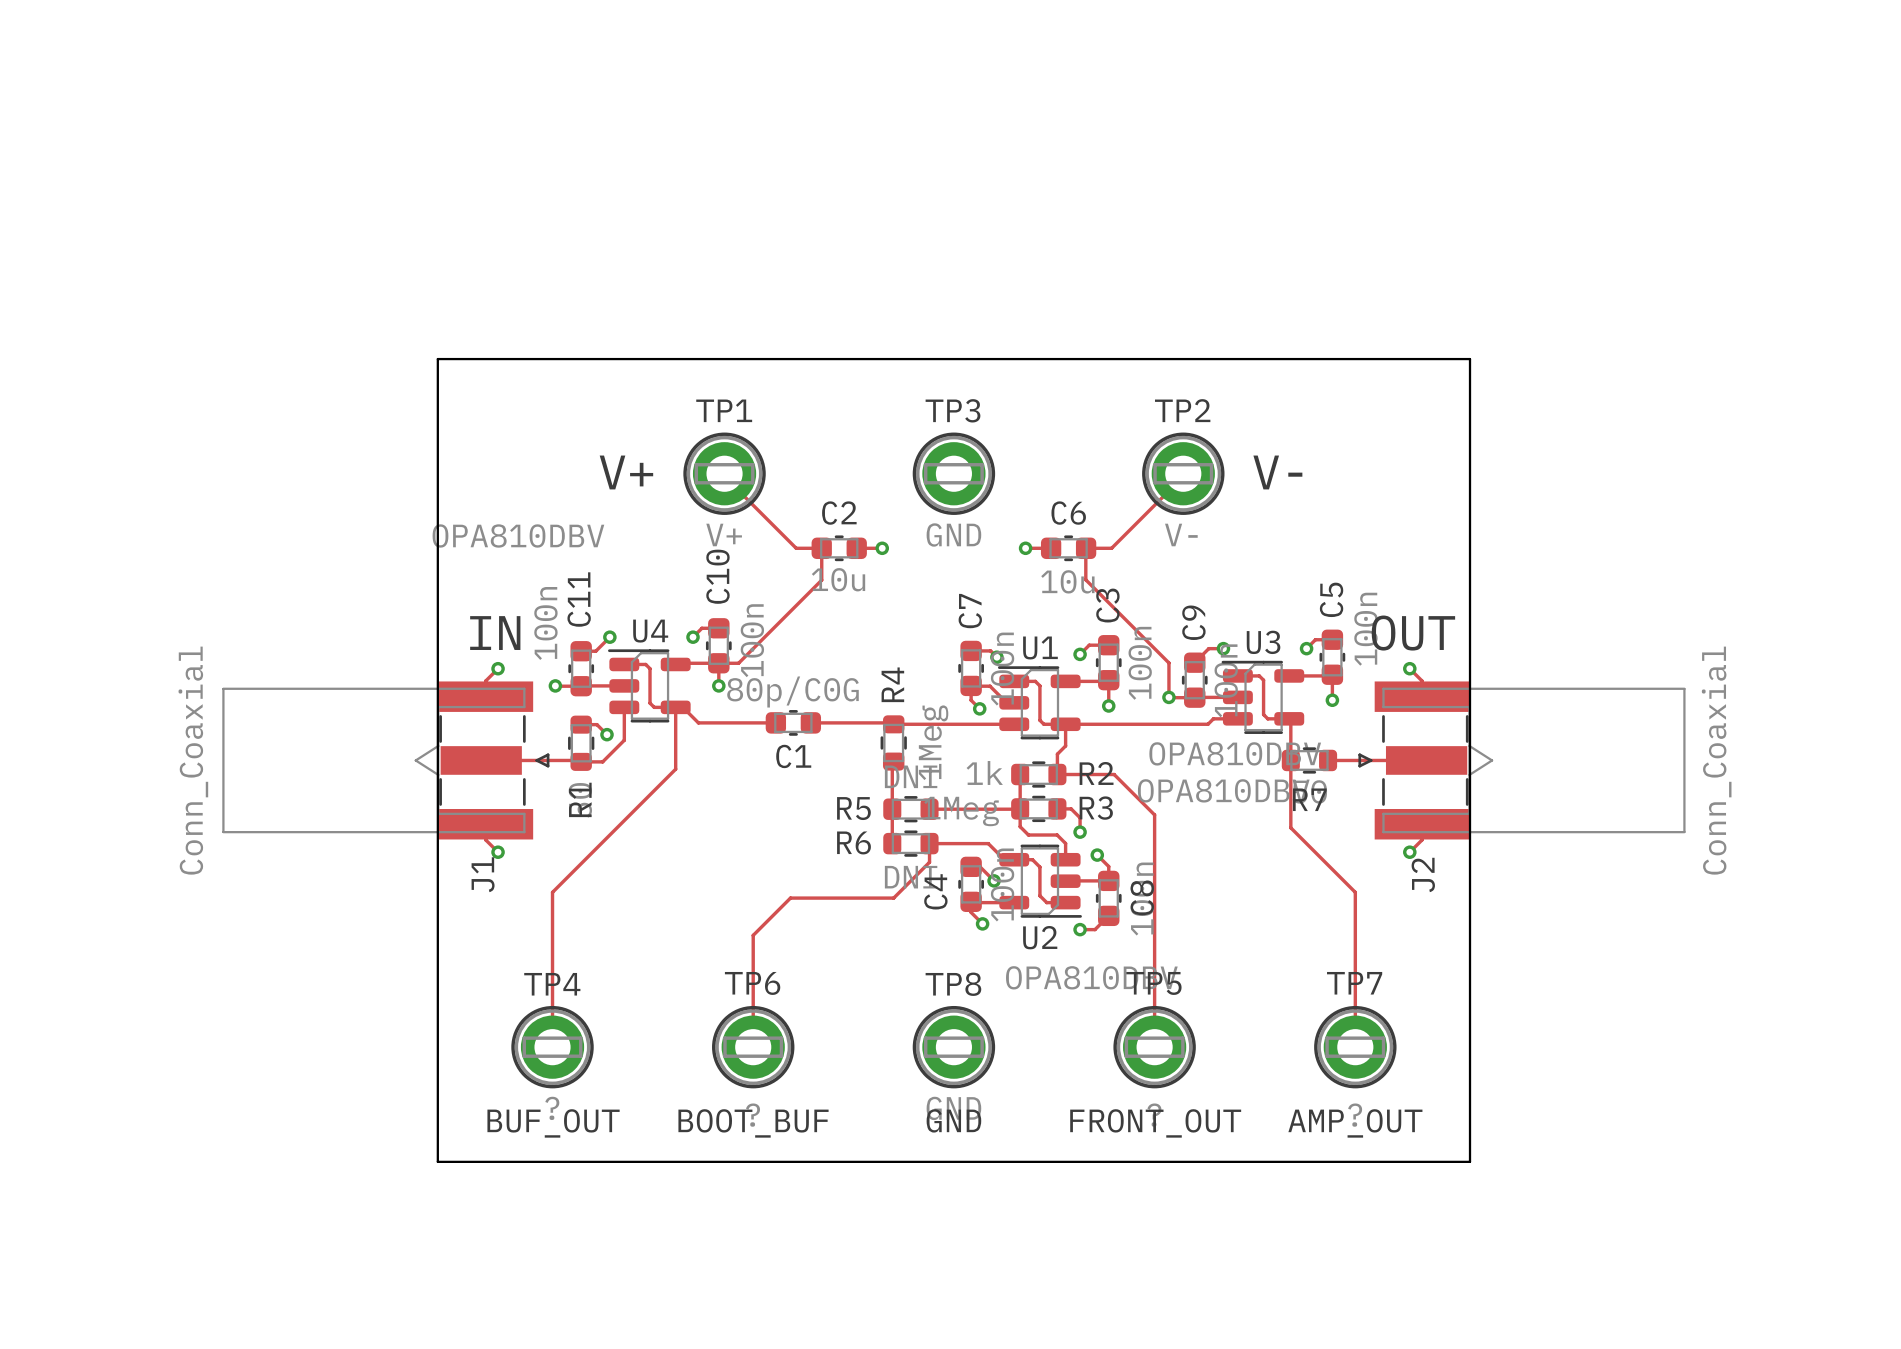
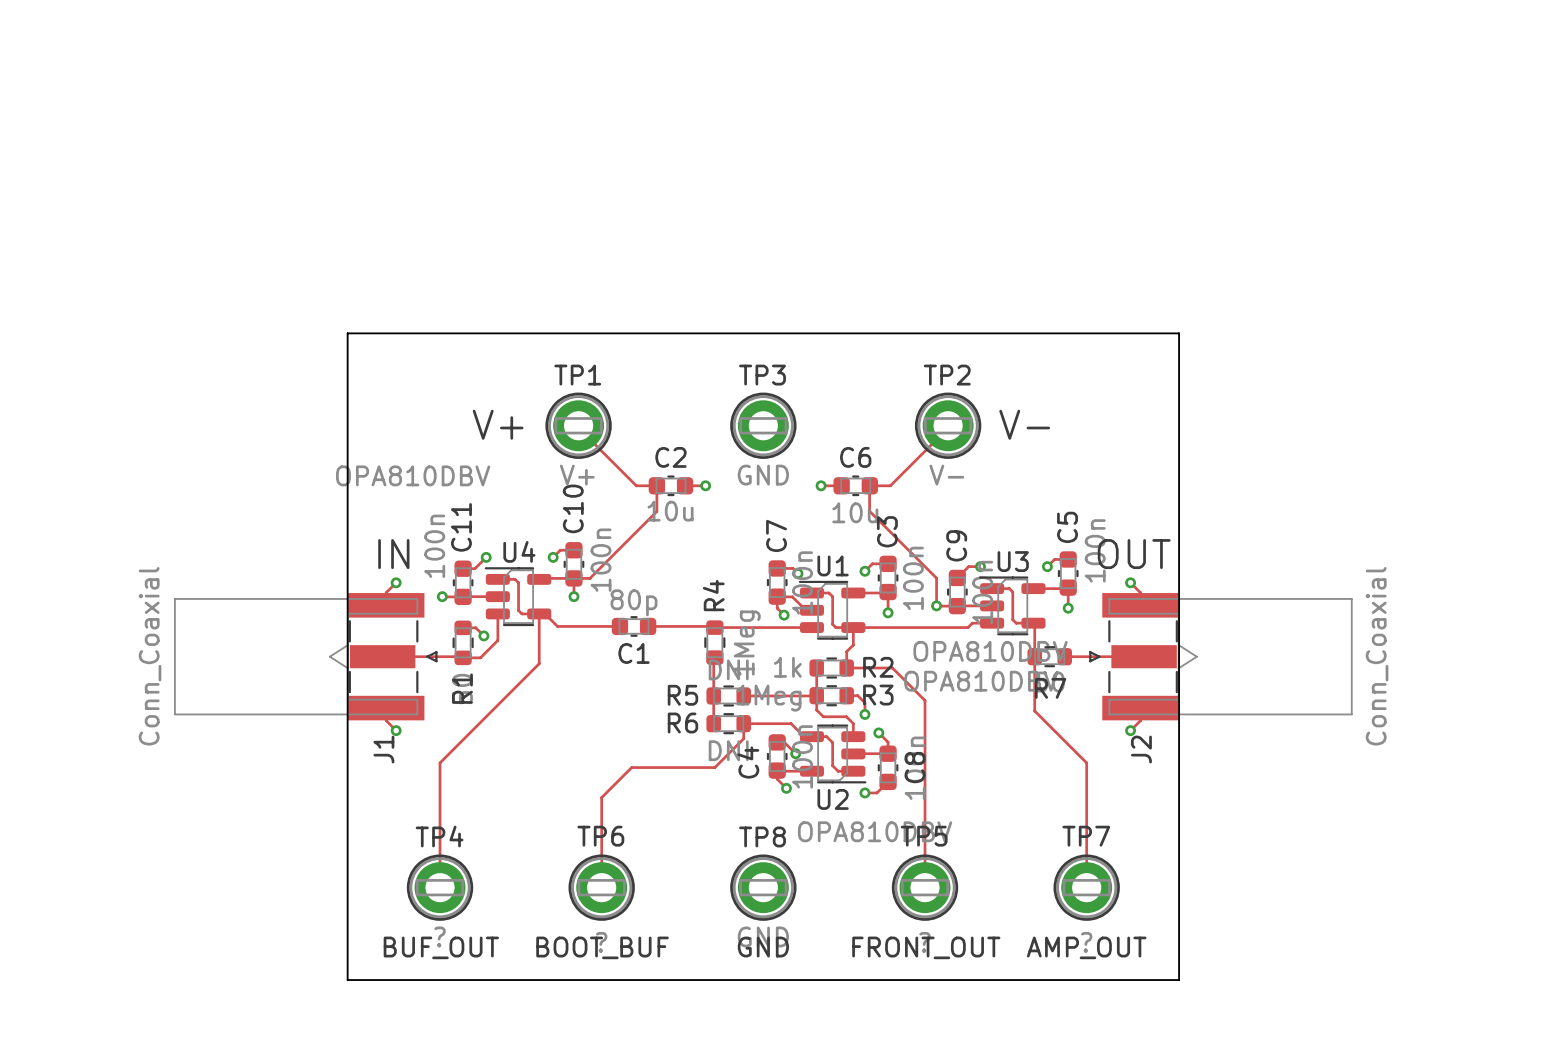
C1 value: 80p/C0G (792, 692) -> 80p (634, 602)

